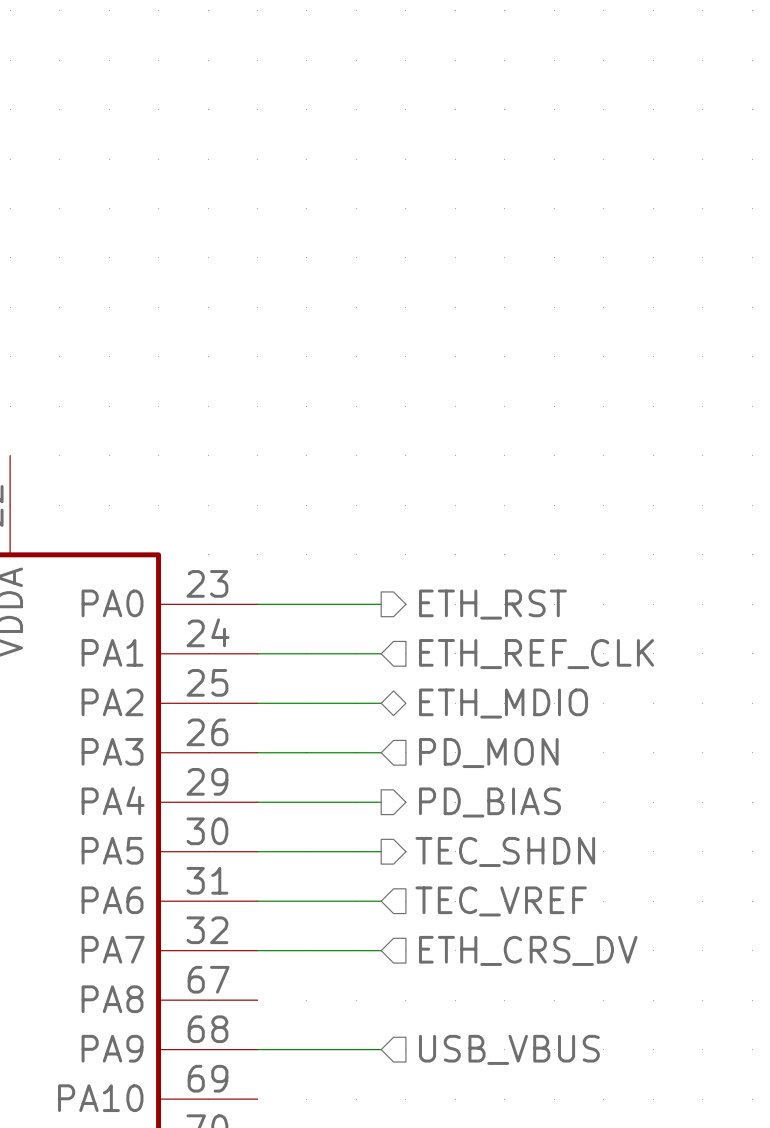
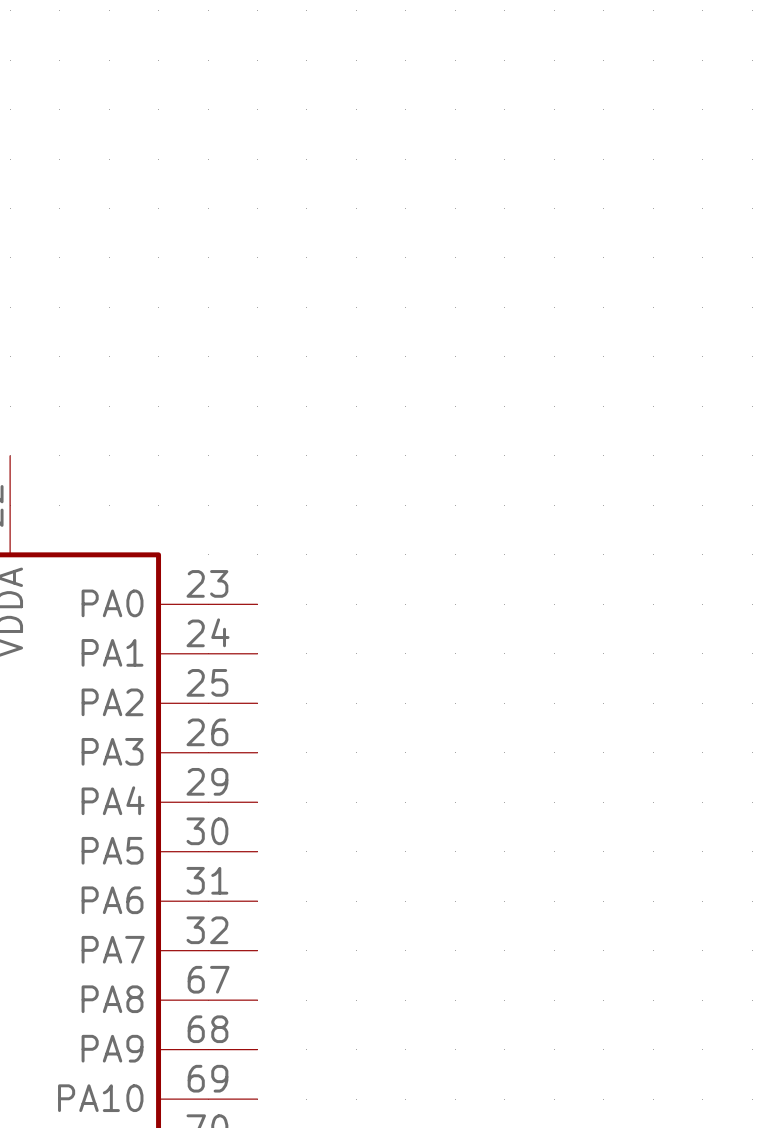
wire: (257, 604) (381, 604) -> none
hierarchical label: ETH_RST (492, 604) -> none
wire: (257, 653) (381, 653) -> none
hierarchical label: ETH_REF_CLK (536, 654) -> none
wire: (257, 703) (381, 703) -> none
hierarchical label: ETH_MDIO (503, 703) -> none
wire: (257, 752) (381, 752) -> none
hierarchical label: PD_MON (488, 753) -> none
wire: (257, 802) (381, 802) -> none
hierarchical label: PD_BIAS (489, 802) -> none
wire: (257, 851) (381, 851) -> none
hierarchical label: TEC_SHDN (505, 851) -> none
wire: (257, 901) (381, 901) -> none
hierarchical label: TEC_VREF (501, 901) -> none
wire: (257, 950) (381, 950) -> none
hierarchical label: ETH_CRS_DV (528, 950) -> none
wire: (257, 1049) (381, 1049) -> none
hierarchical label: USB_VBUS (509, 1049) -> none

